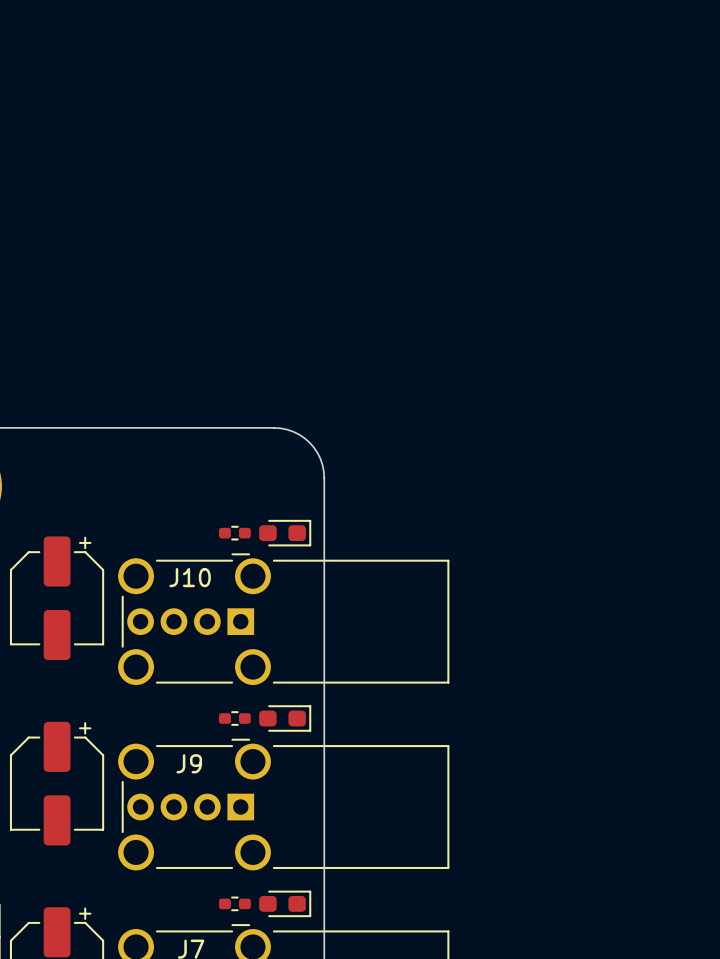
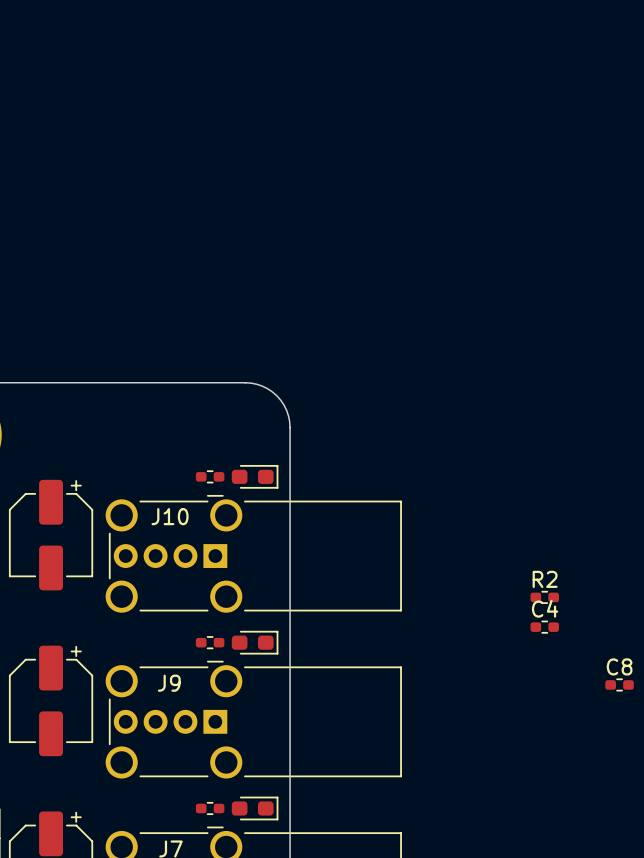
R2: none -> (544, 597)
C4: none -> (544, 627)
C8: none -> (619, 684)

